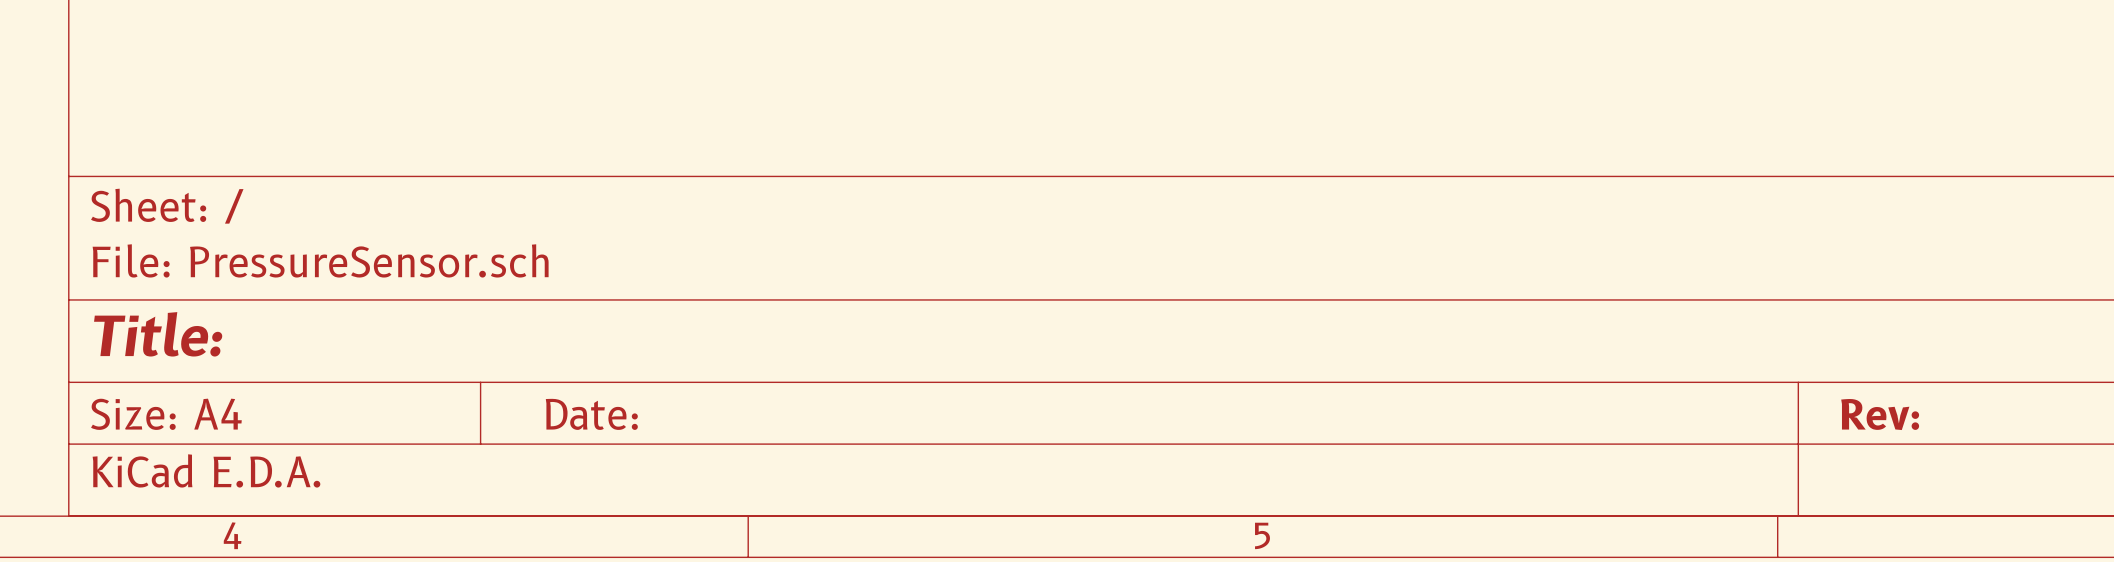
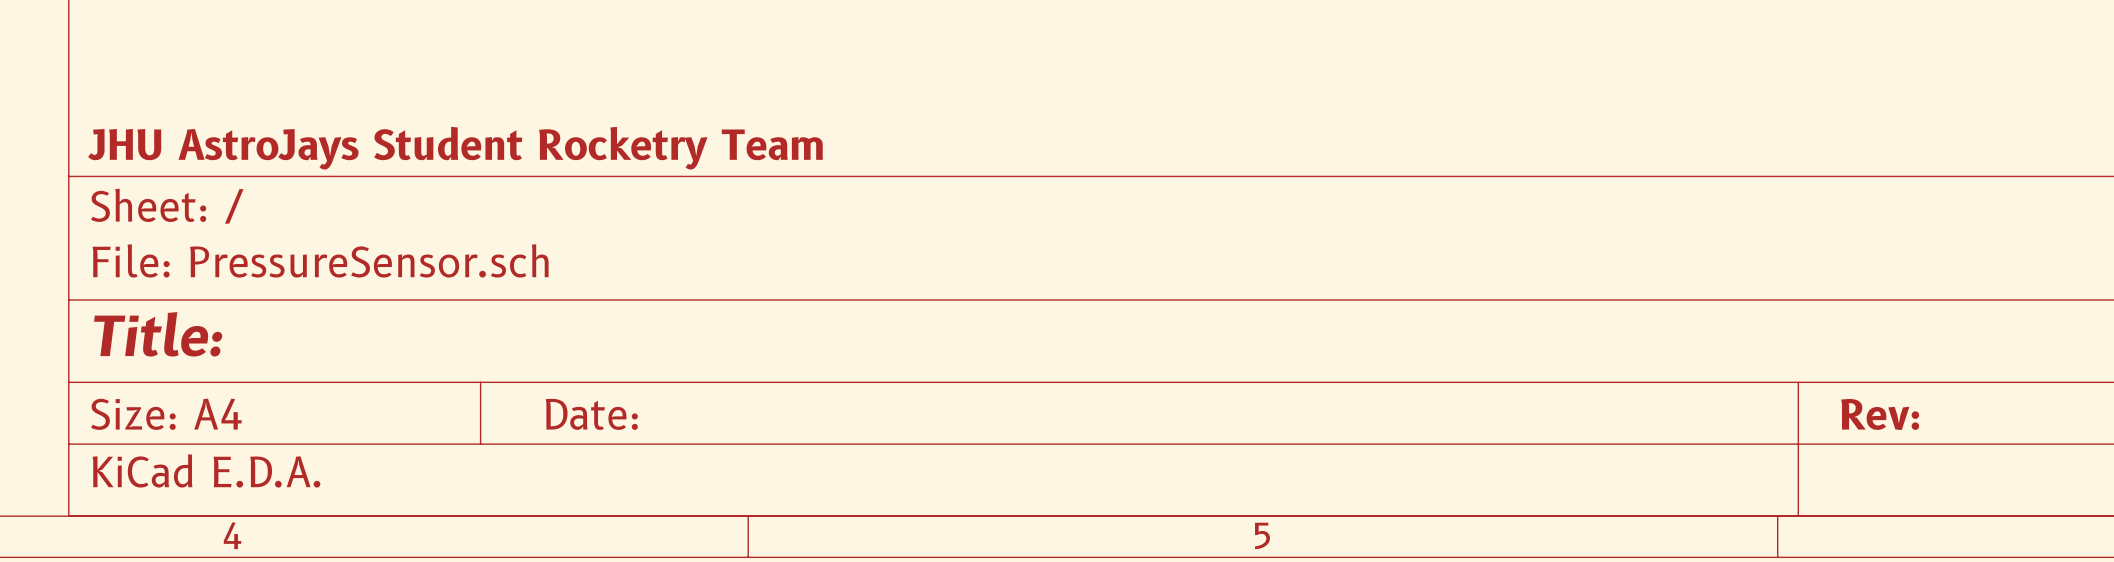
title block: none -> JHU AstroJays Student Rocketry Team (455, 148)

